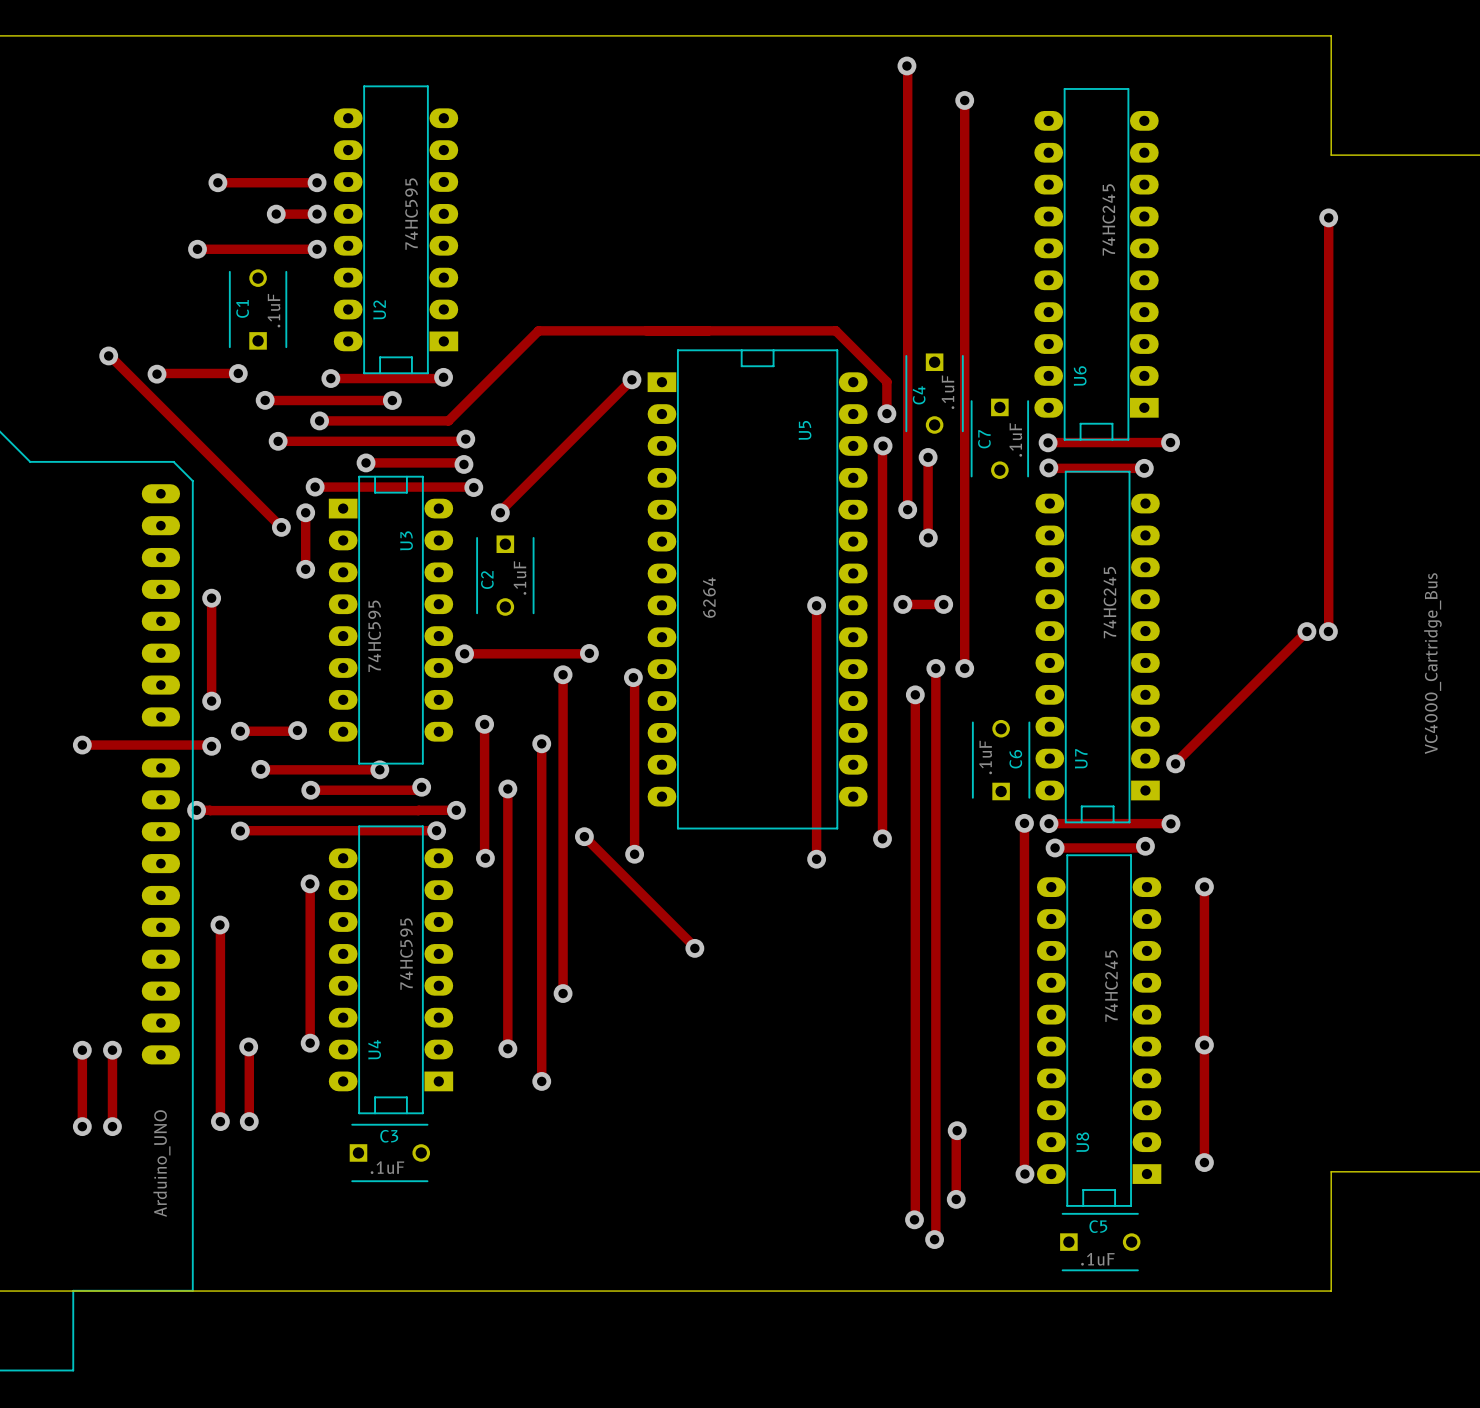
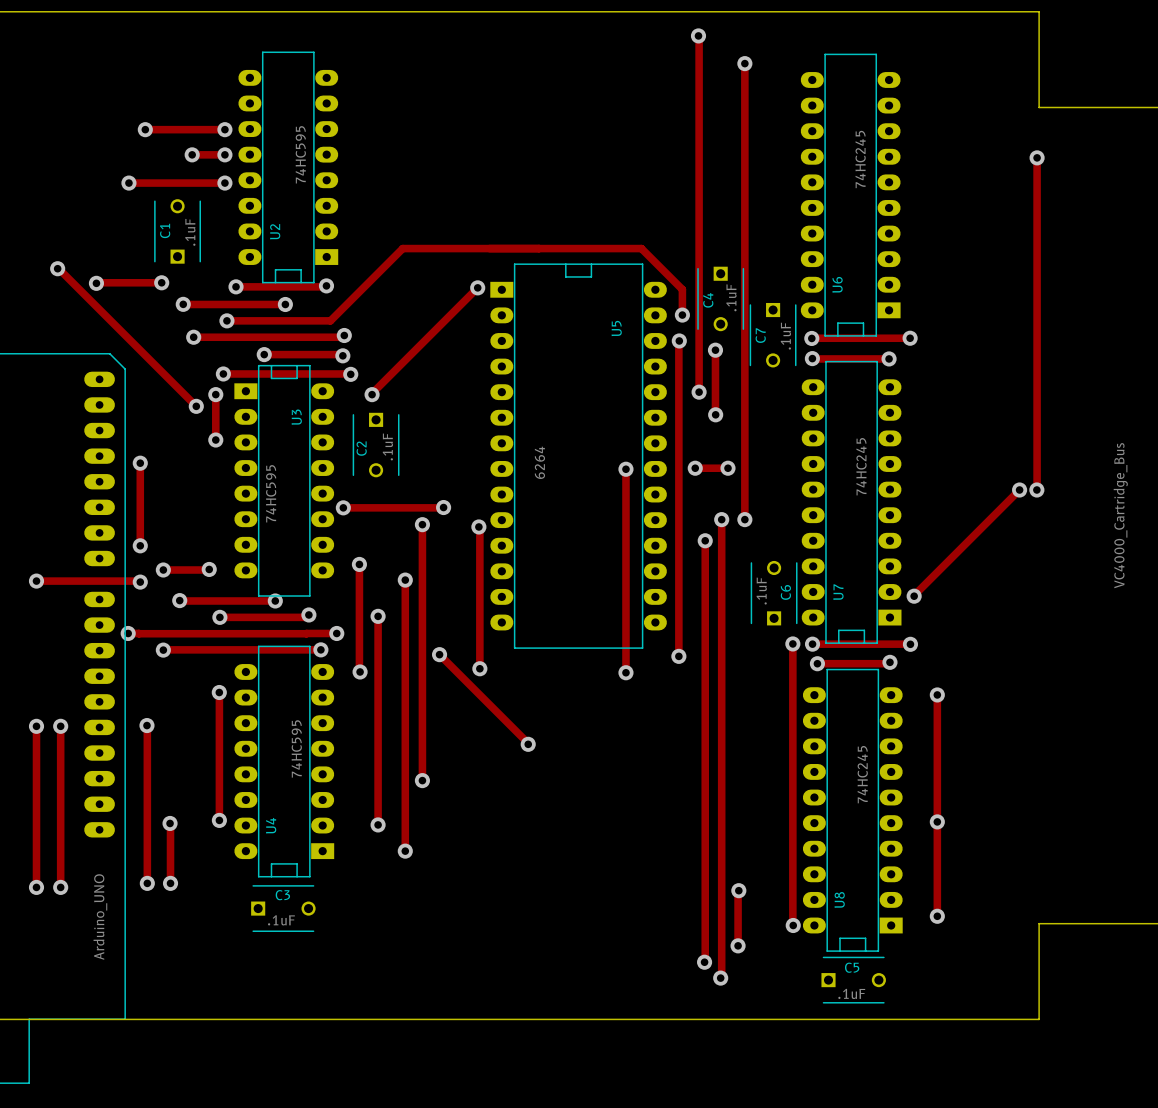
track: none -> (36, 726) (36, 826)
via: none -> (36, 726)
track: none -> (60, 726) (60, 826)
via: none -> (60, 726)
via: (82, 1050) -> none
via: (112, 1050) -> none

